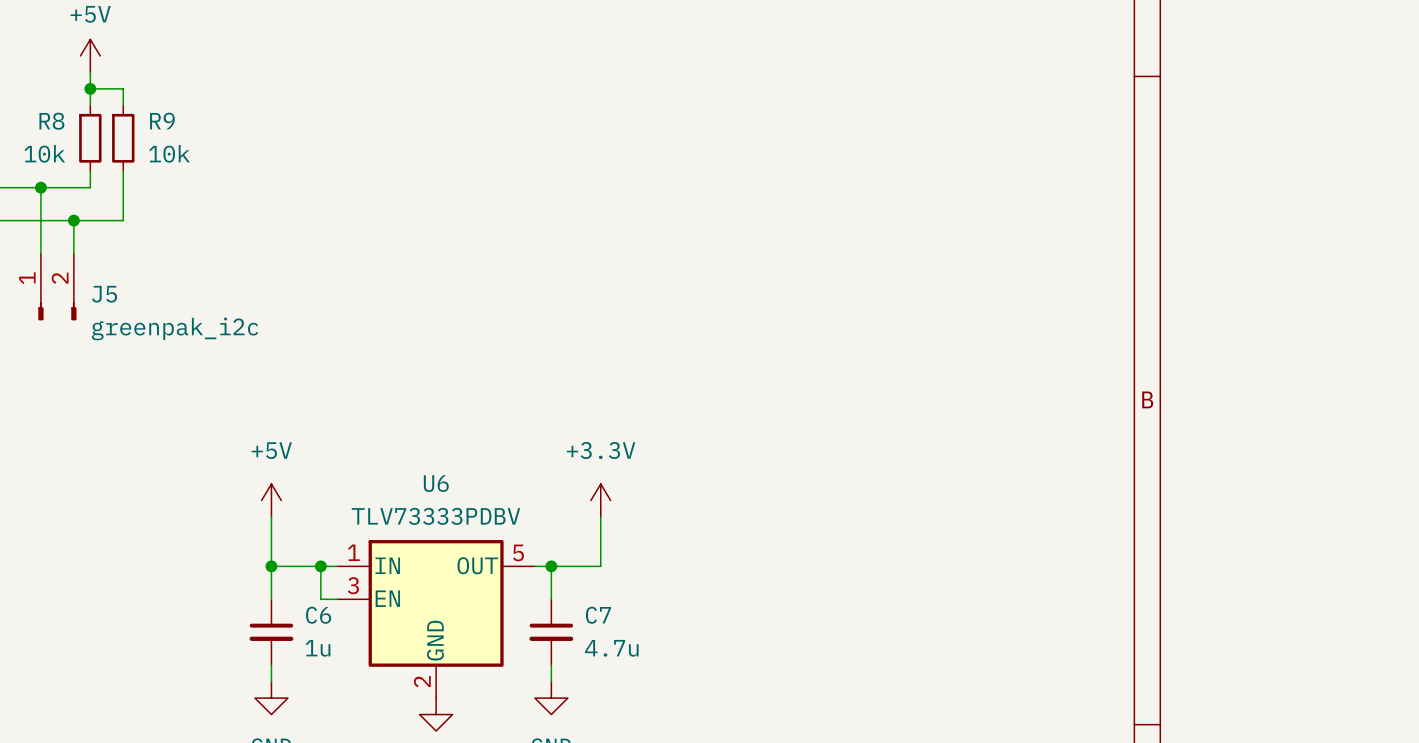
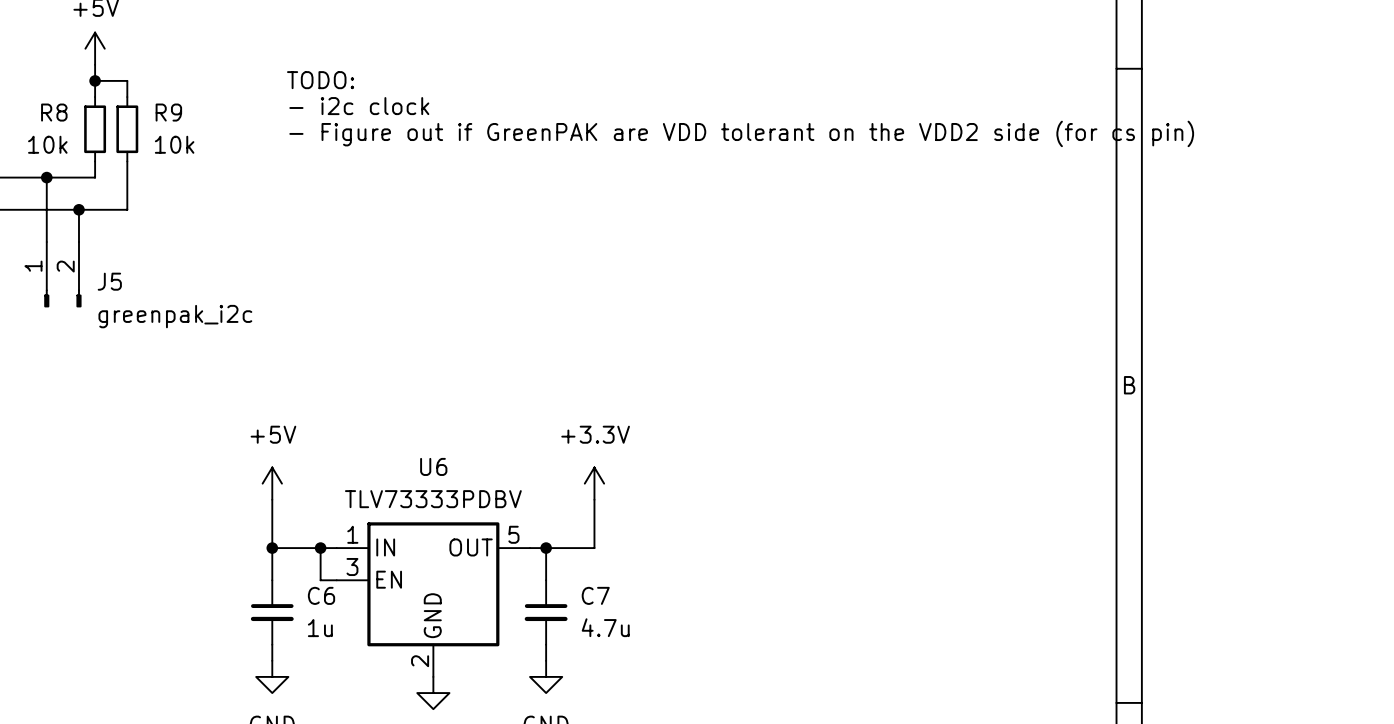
text: none -> TODO: (320, 80)
text: none -> - i2c clock (359, 106)
text: none -> - Figure out if GreenPAK are VDD tolerant on the VDD2 side (for cs pin) (741, 133)

